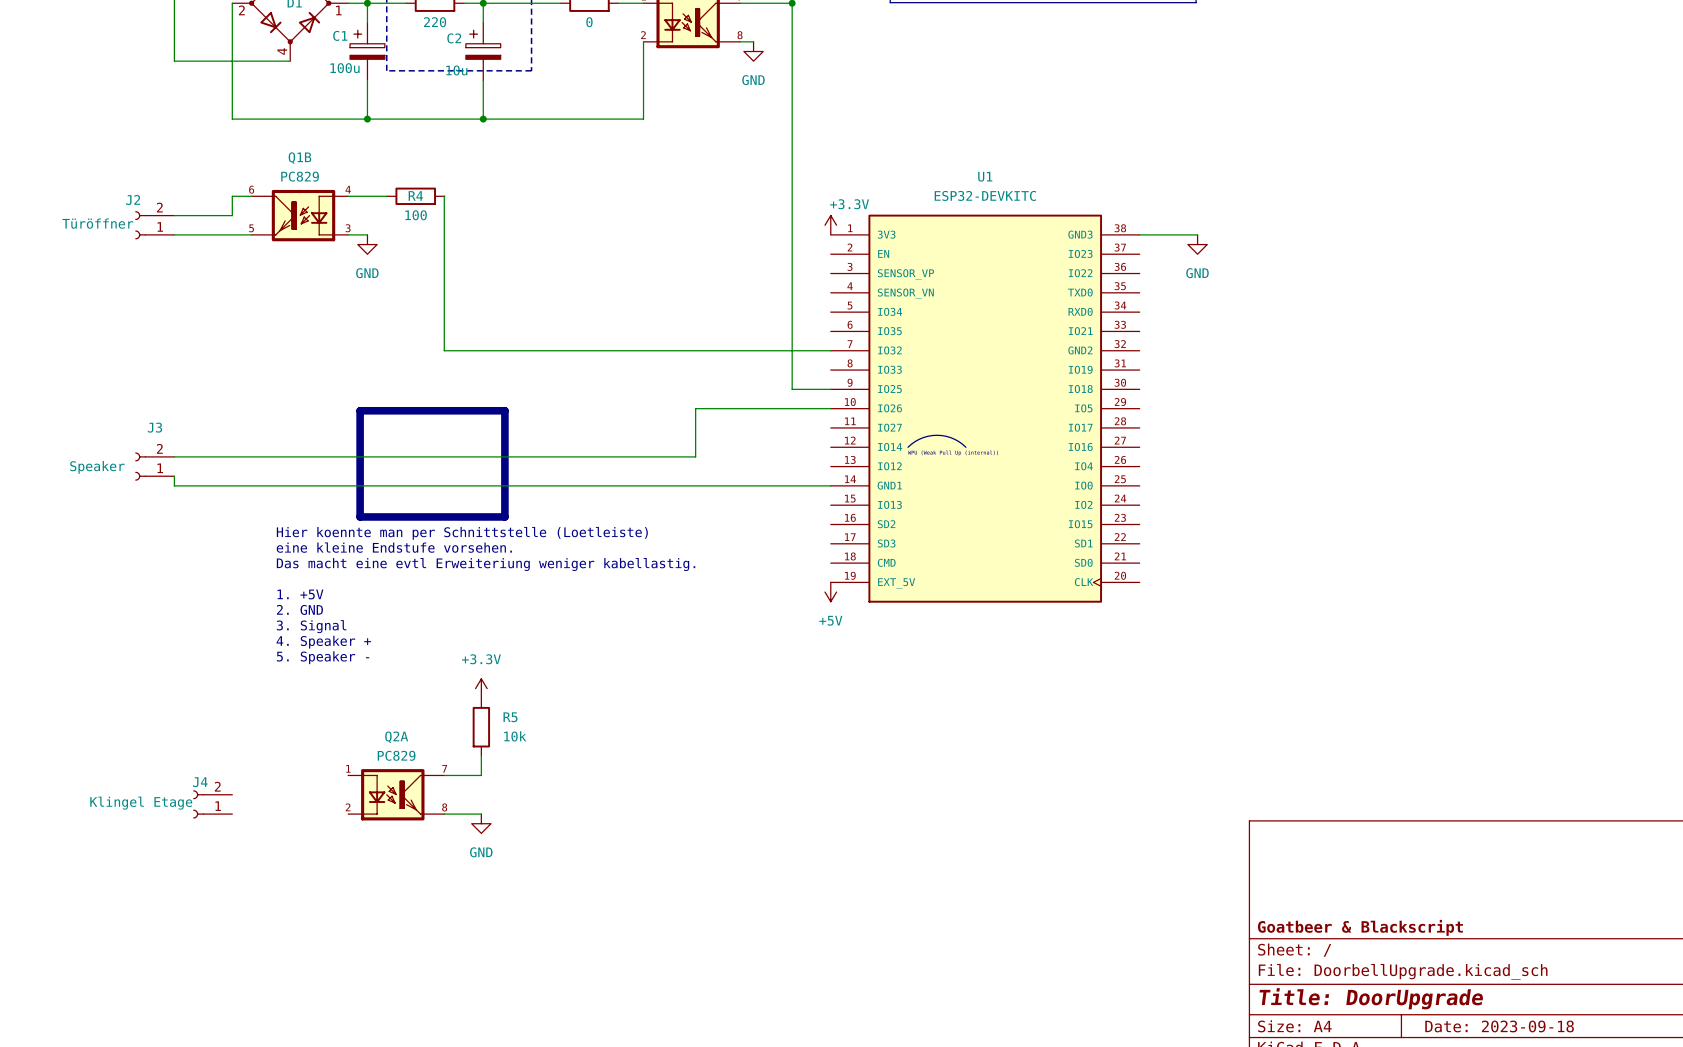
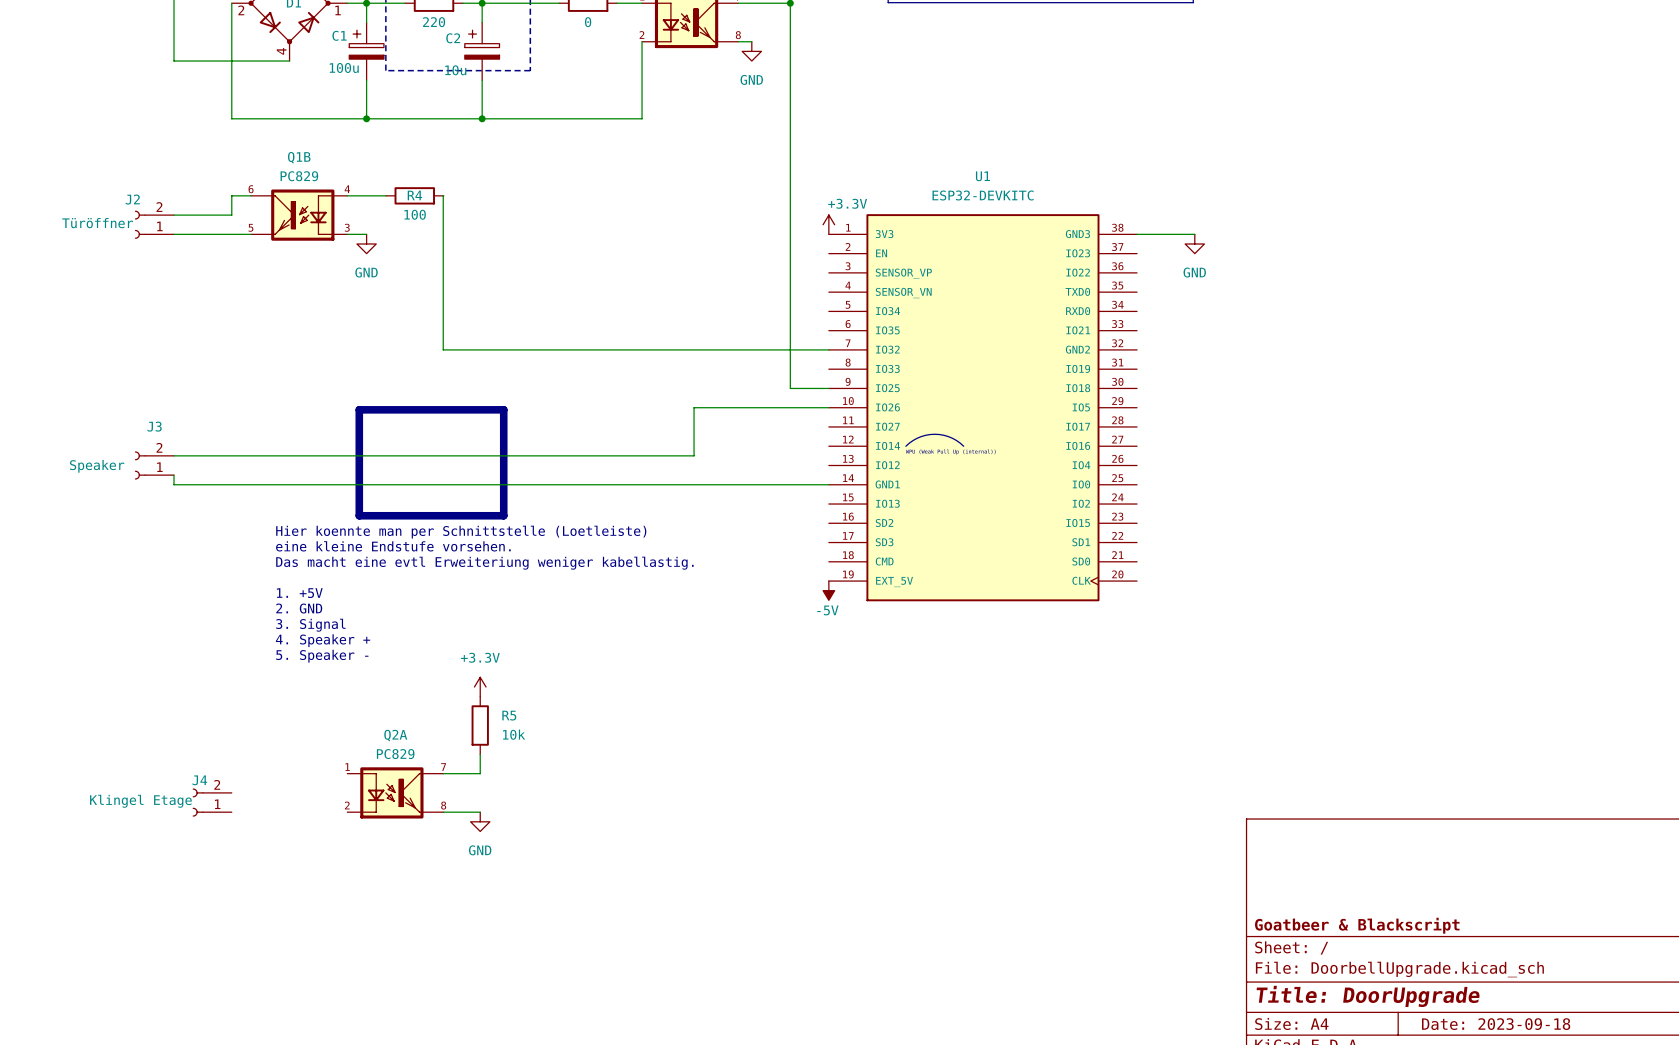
power symbol: +5V (830, 592) -> -5V (828, 590)

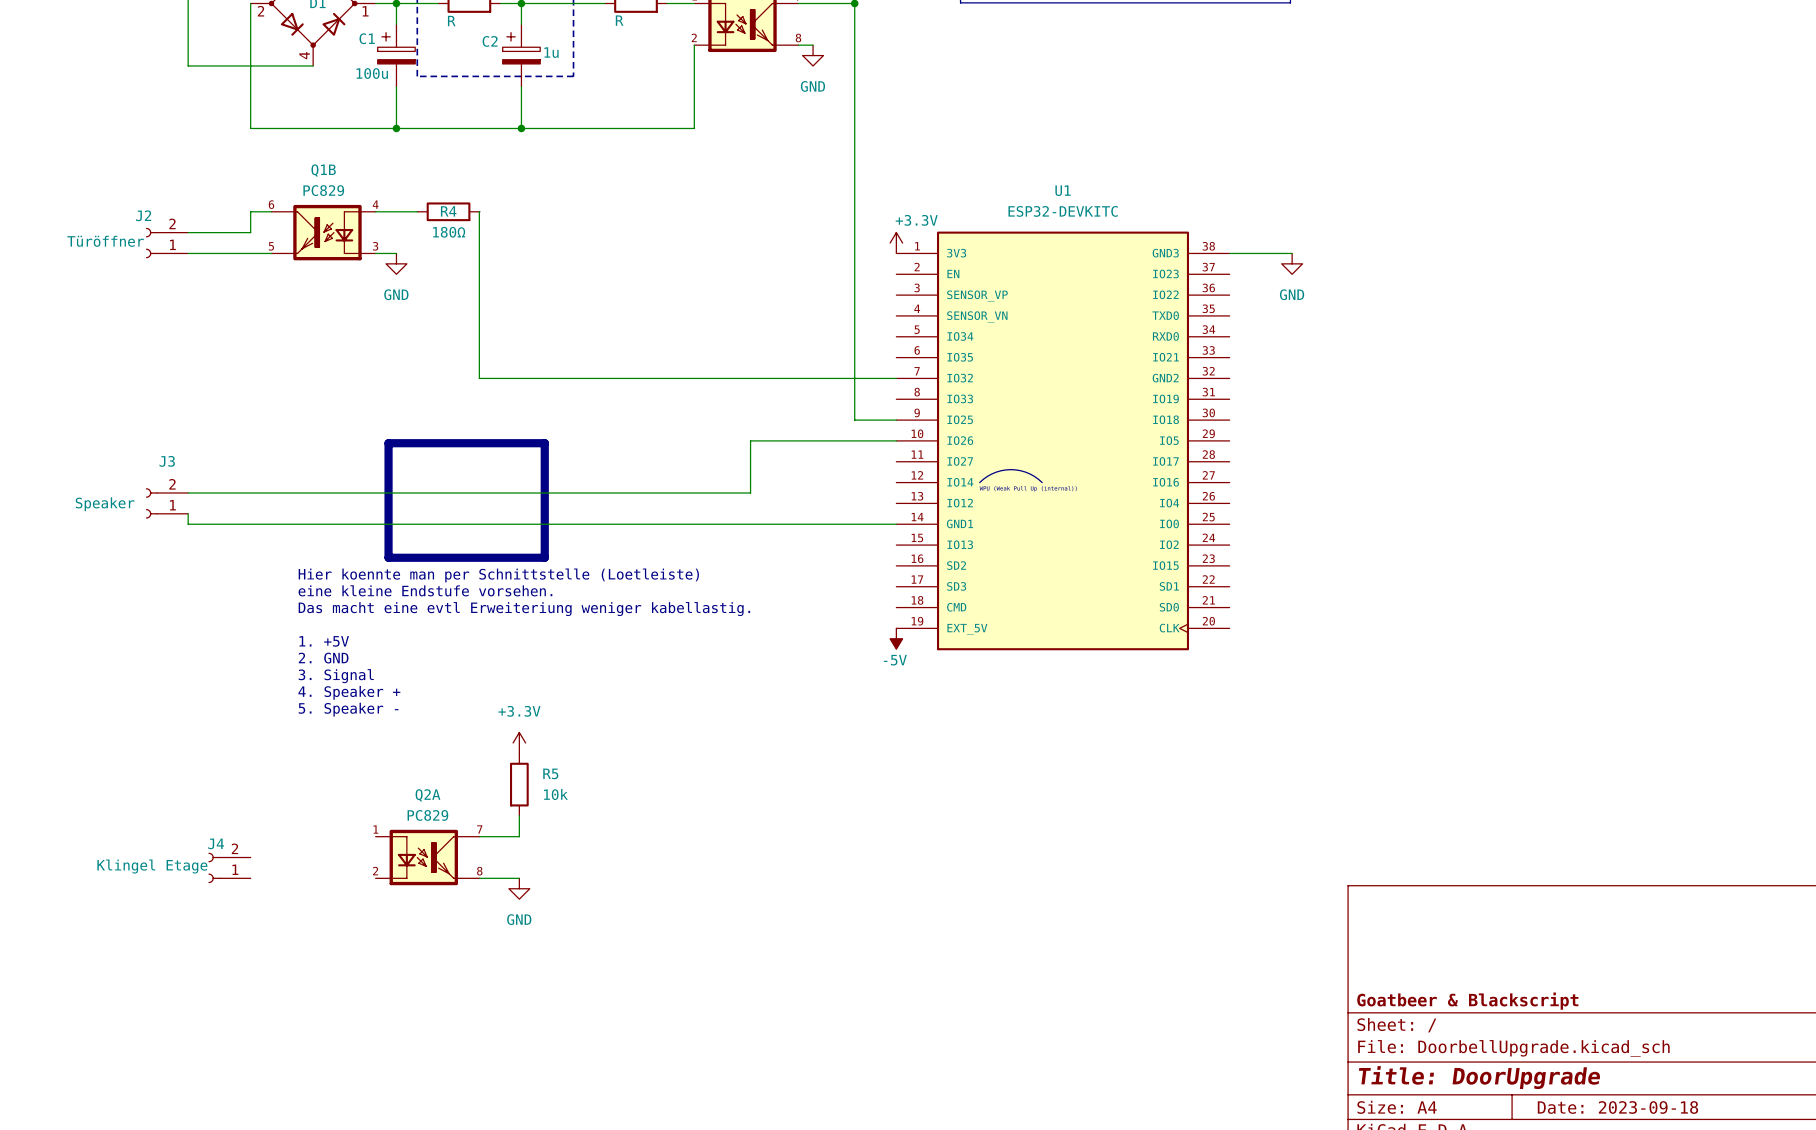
part value: 220 (434, 22) -> R (451, 21)
part value: 0 (588, 22) -> R (619, 20)
C2 value: 10u (455, 70) -> 1u (551, 52)
R4 value: 100 (415, 214) -> 180Ω (449, 232)

